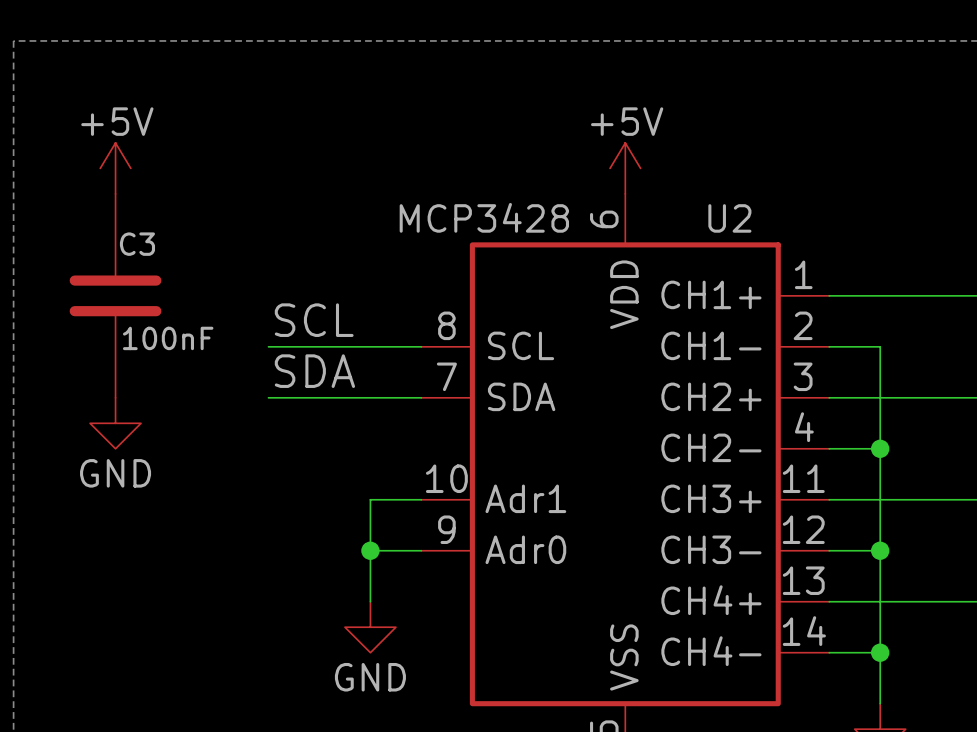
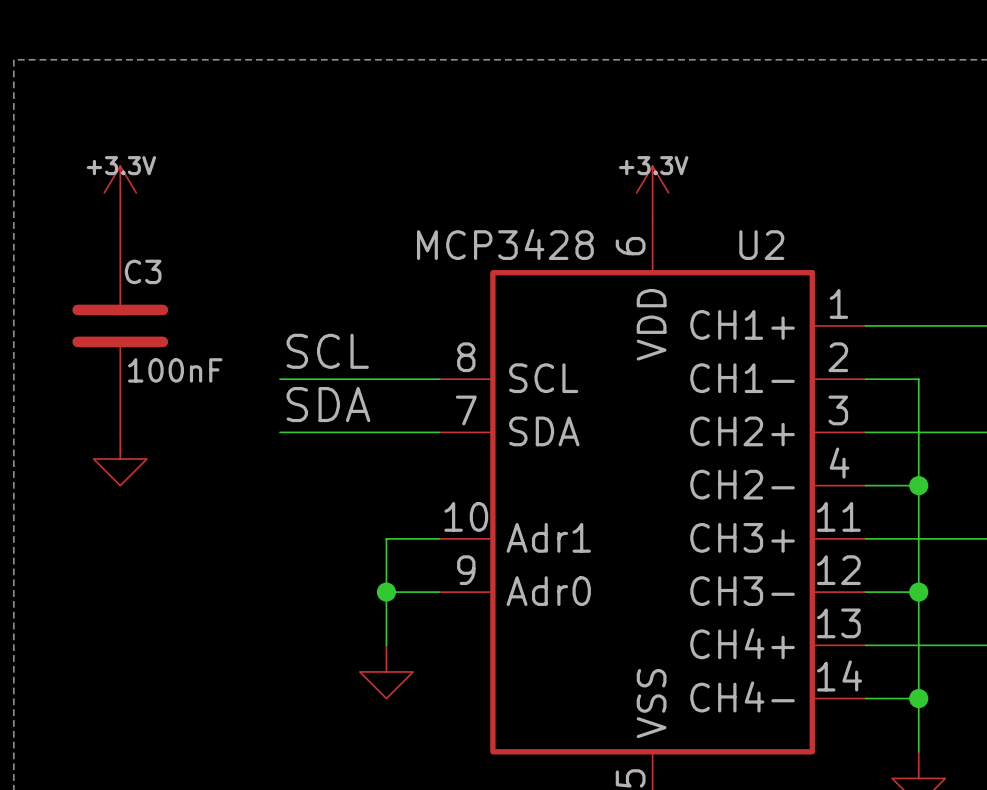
power symbol: +5V (115, 168) -> +3.3V (120, 192)
power symbol: +5V (625, 168) -> +3.3V (652, 192)
power symbol text: GND (115, 473) -> none
power symbol text: GND (370, 677) -> none

